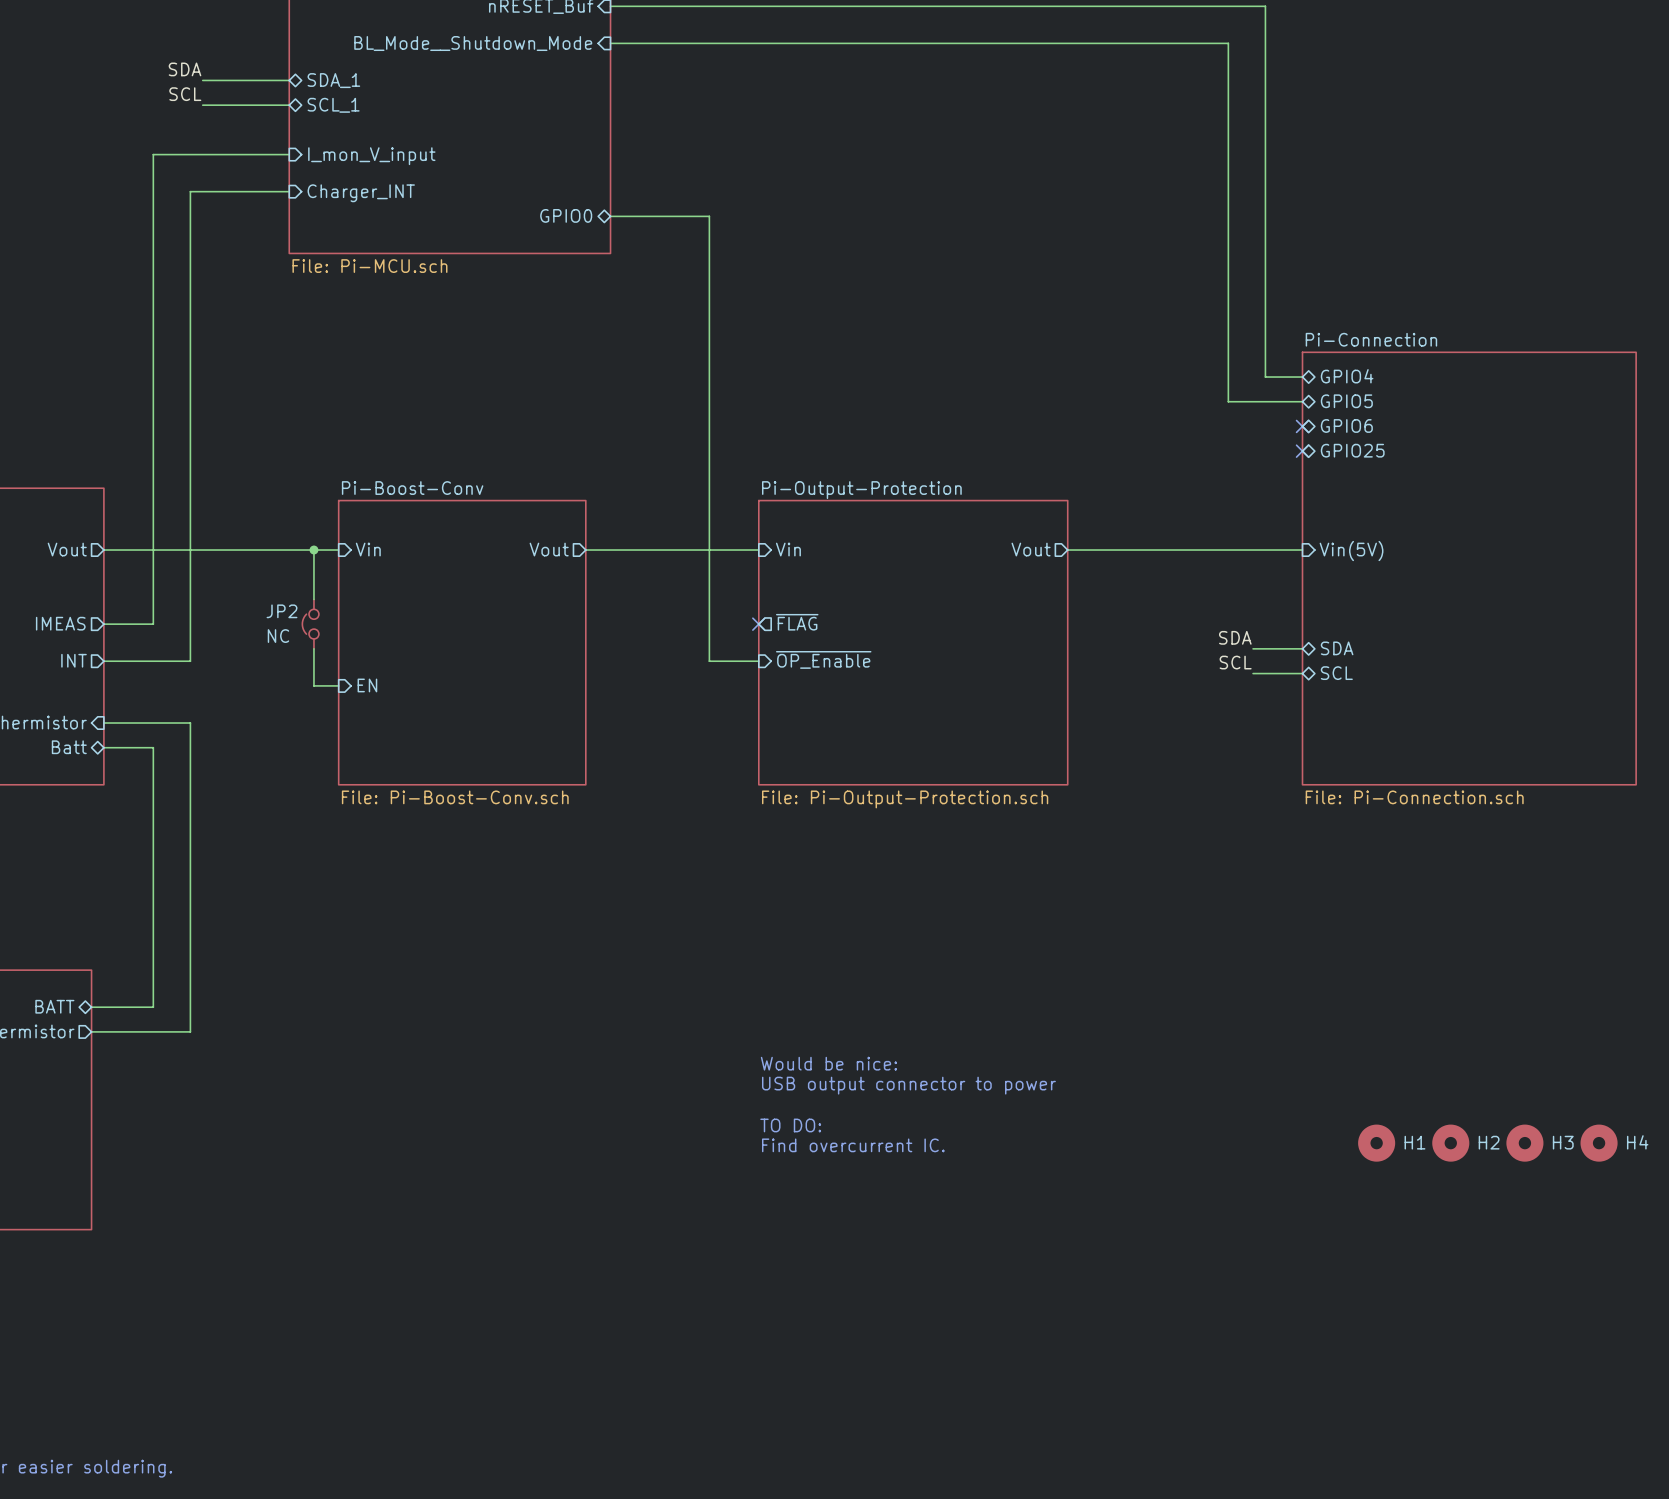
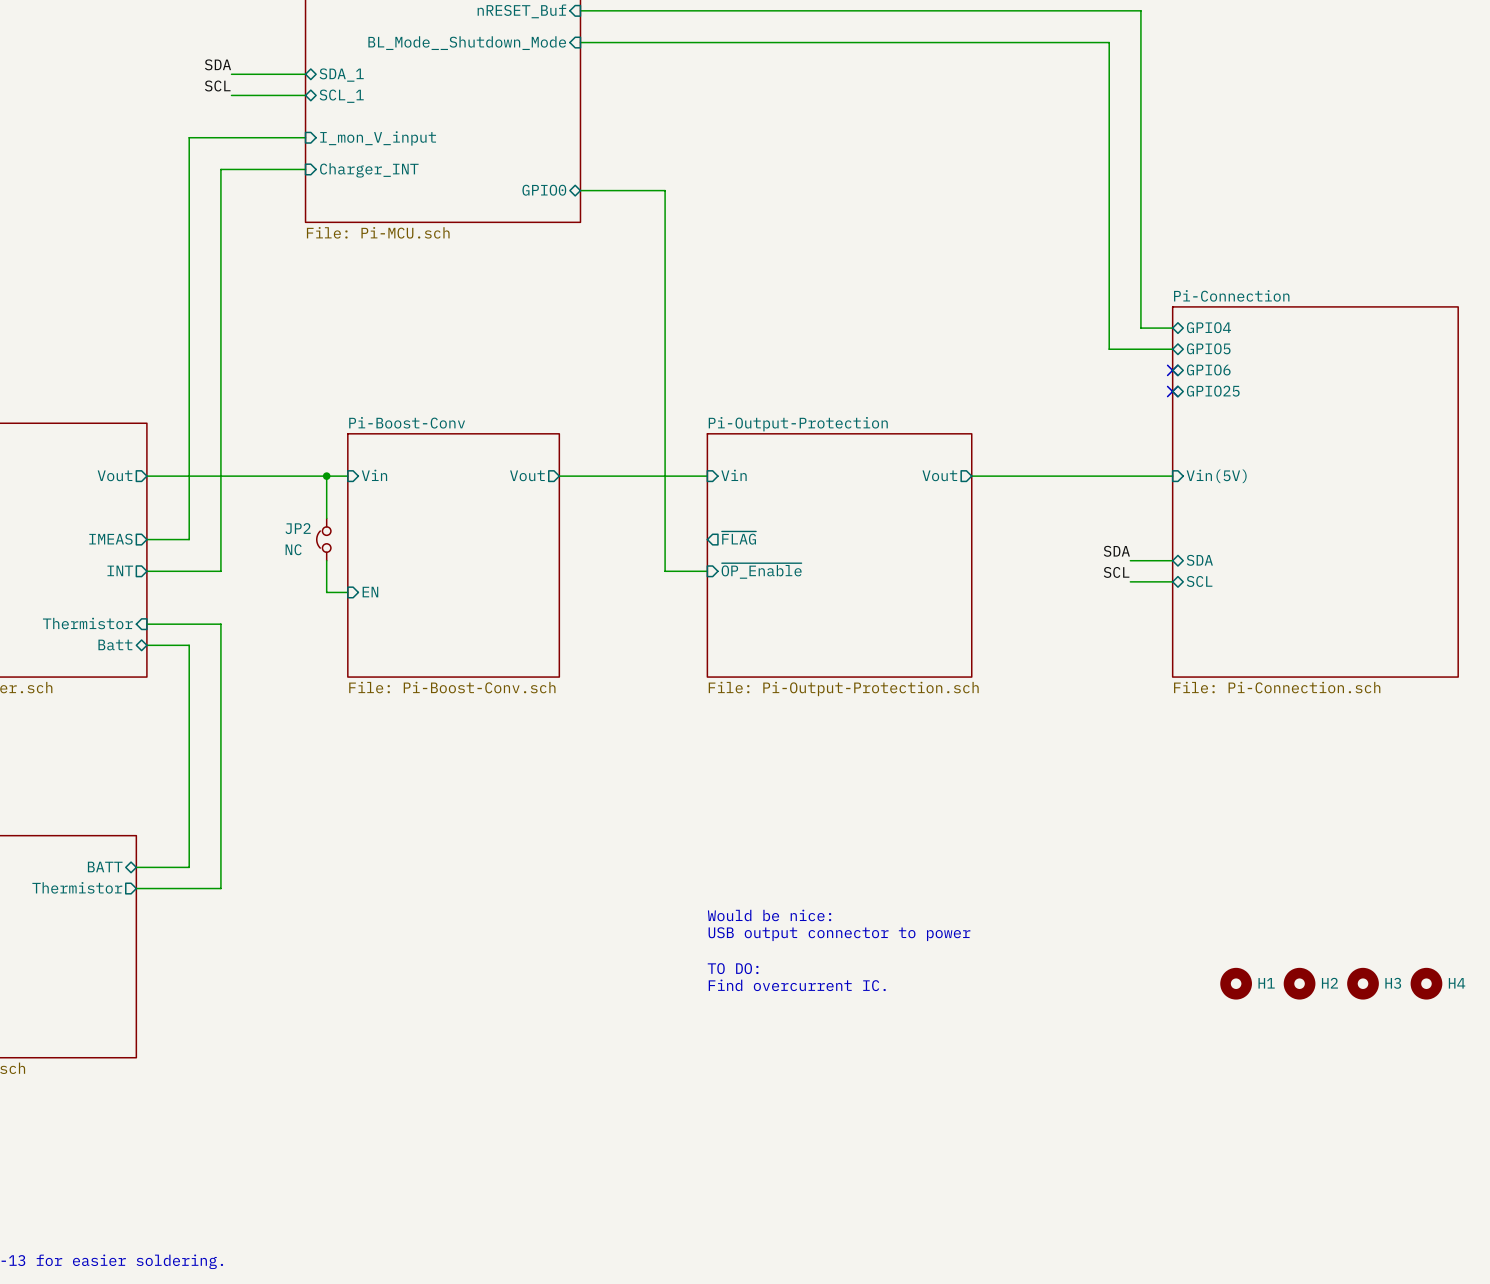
no-connect mark: (758, 624) -> none

